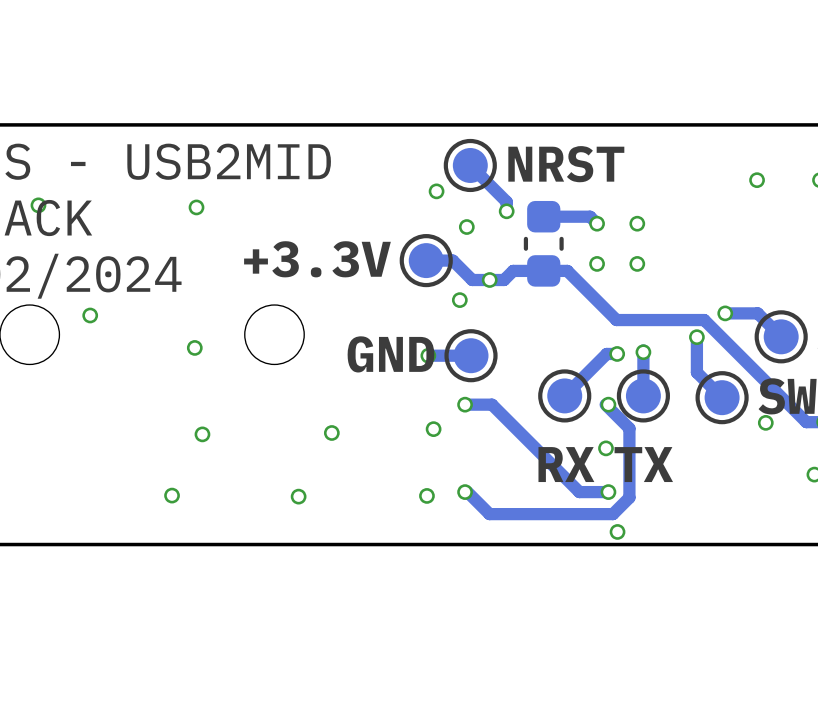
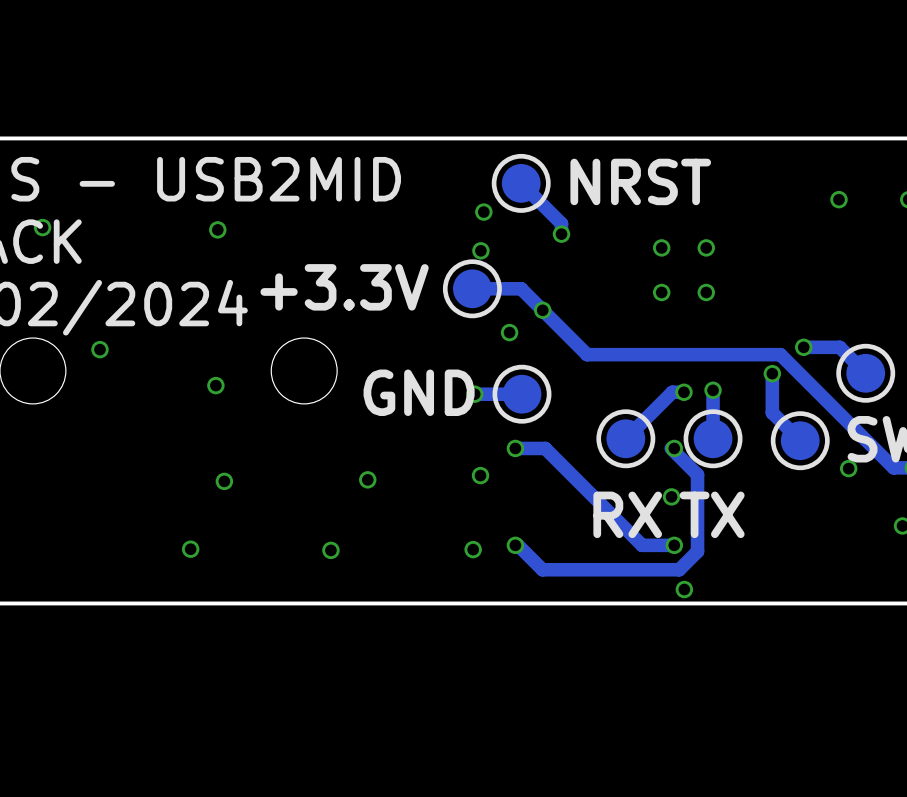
track: (540, 216) (590, 216) (597, 223) -> none
via position: (466, 227) -> (480, 250)
part: (543, 243) -> none
track: (452, 260) (472, 280) (504, 280) (513, 270) (567, 270) (616, 320) -> (501, 288) (521, 288) (587, 354) (683, 354)

